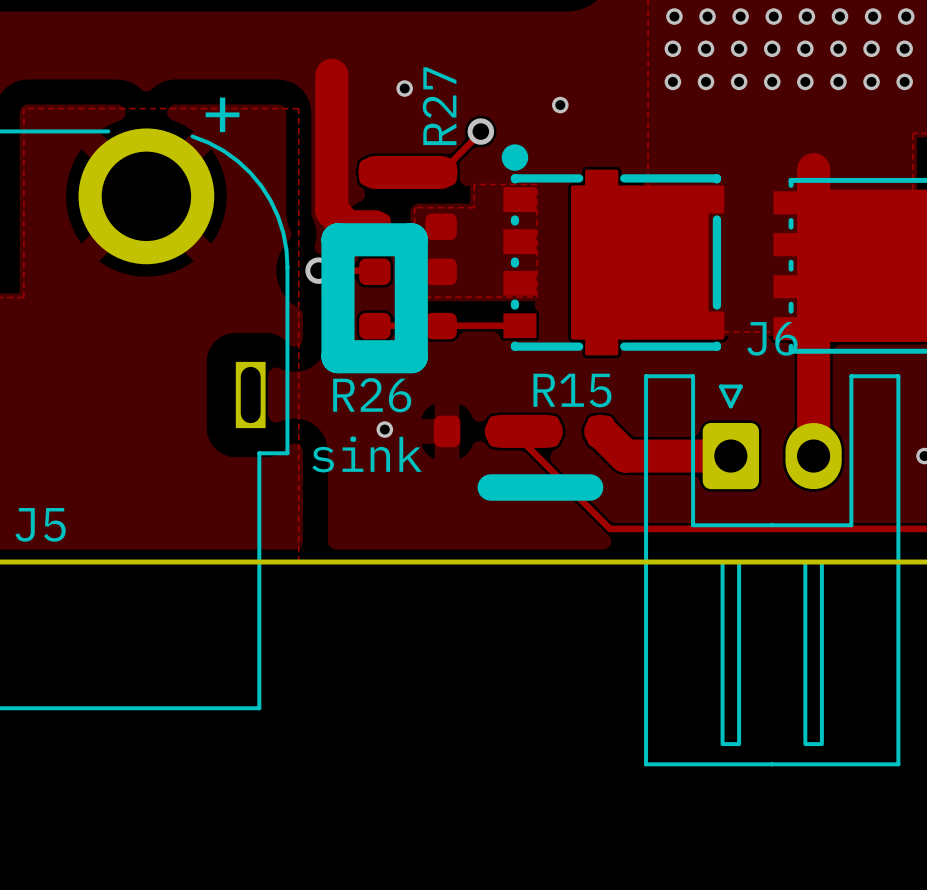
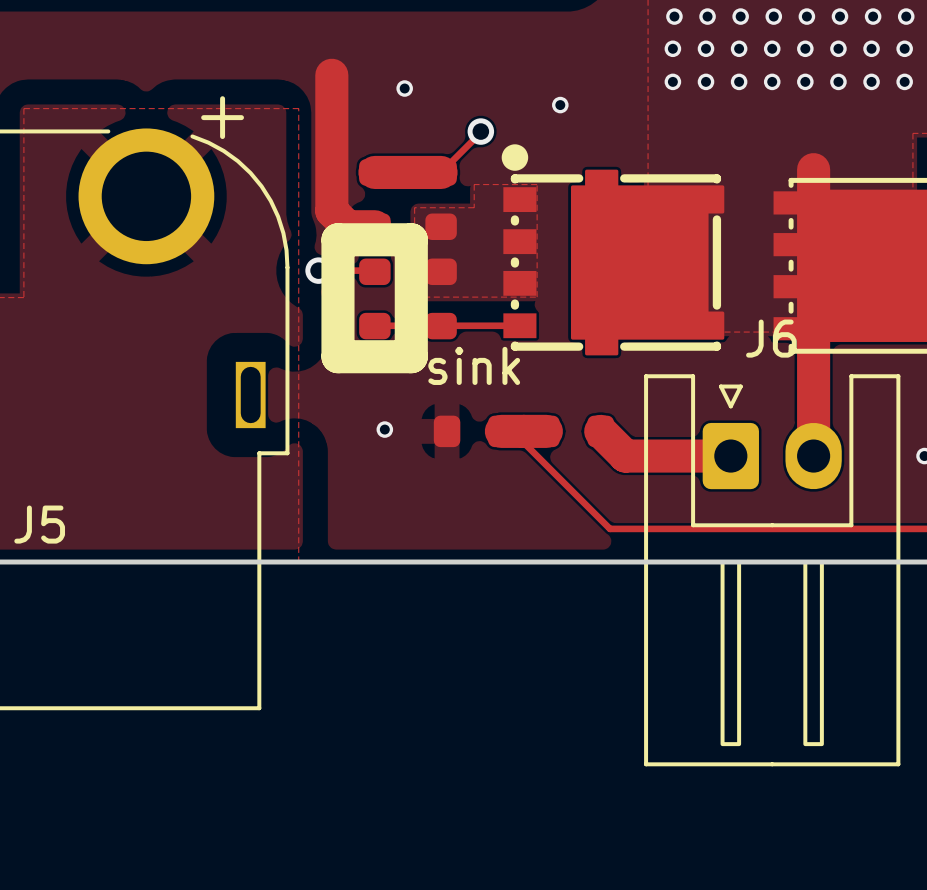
R27 name: R27 (439, 106) -> none
R15 name: R15 (572, 390) -> none
R26 name: R26 (372, 395) -> none
text position: sink (366, 454) -> sink (474, 365)
line: (490, 487) (590, 487) -> none

